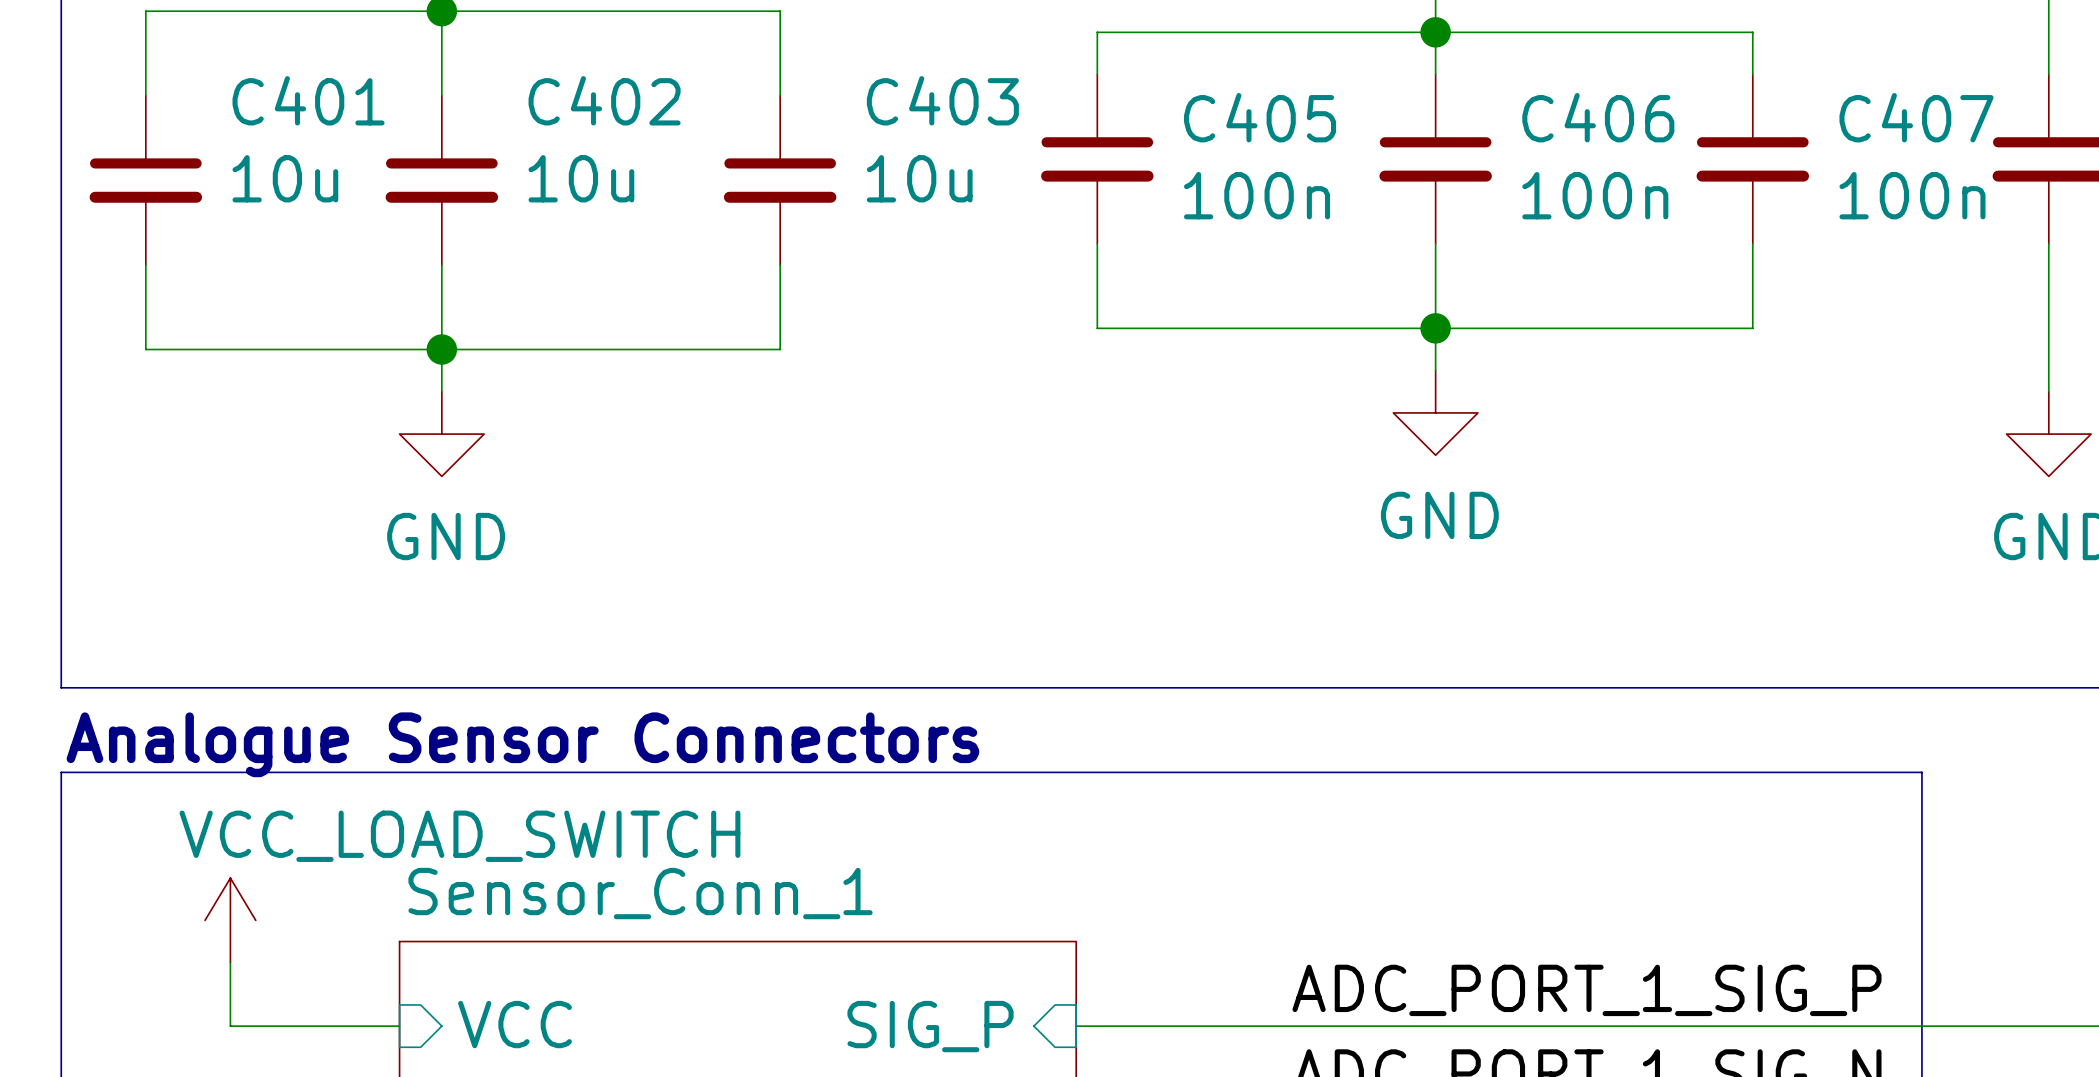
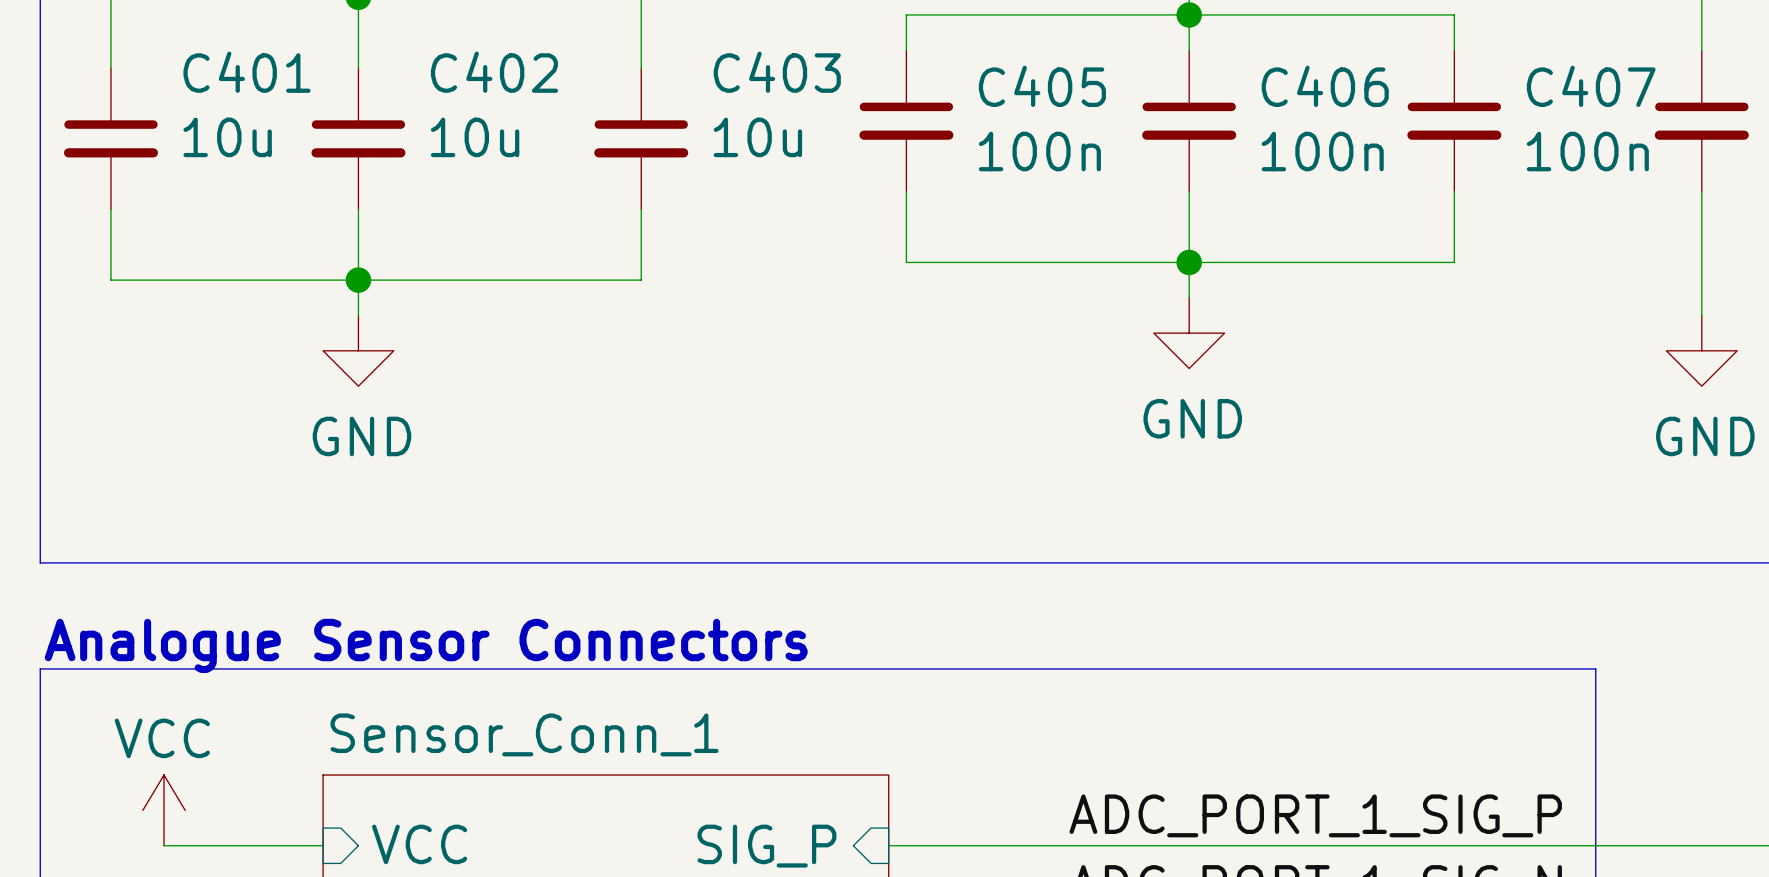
text position: Analogue Sensor Connectors (522, 744) -> Analogue Sensor Connectors (426, 645)
line: (61, 814) (61, 772) (1921, 772) (1921, 814) -> (40, 668) (1595, 668)
power symbol: VCC_LOAD_SWITCH (230, 920) -> none
wire: (230, 962) (230, 1026) -> (164, 845) (181, 845)
power symbol: none -> VCC (164, 810)

